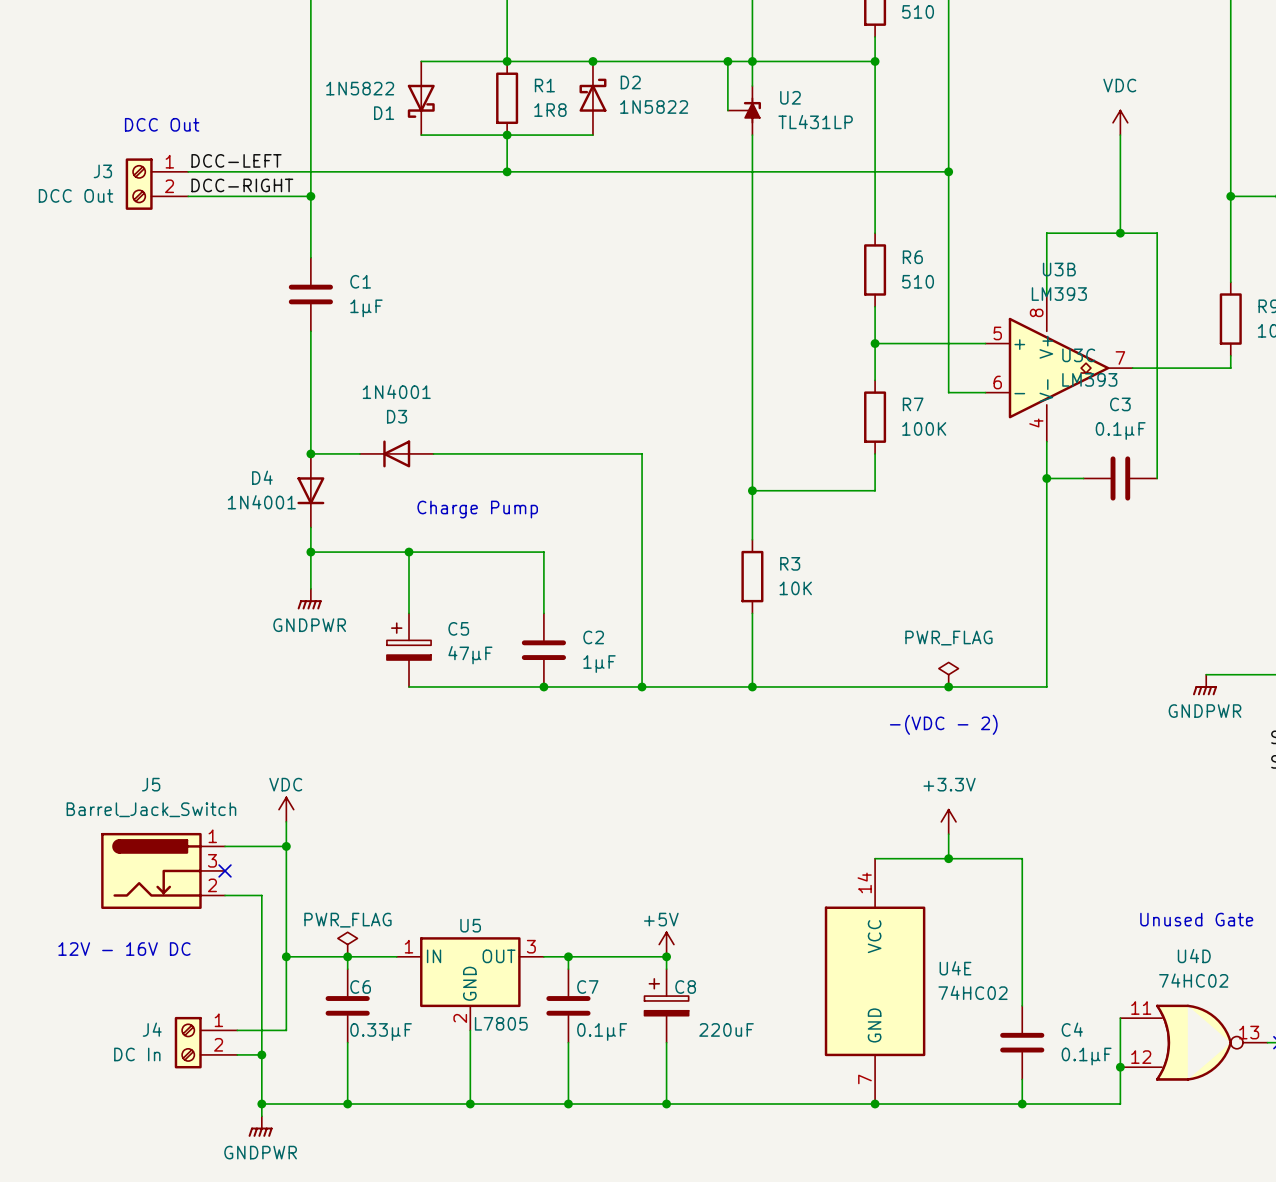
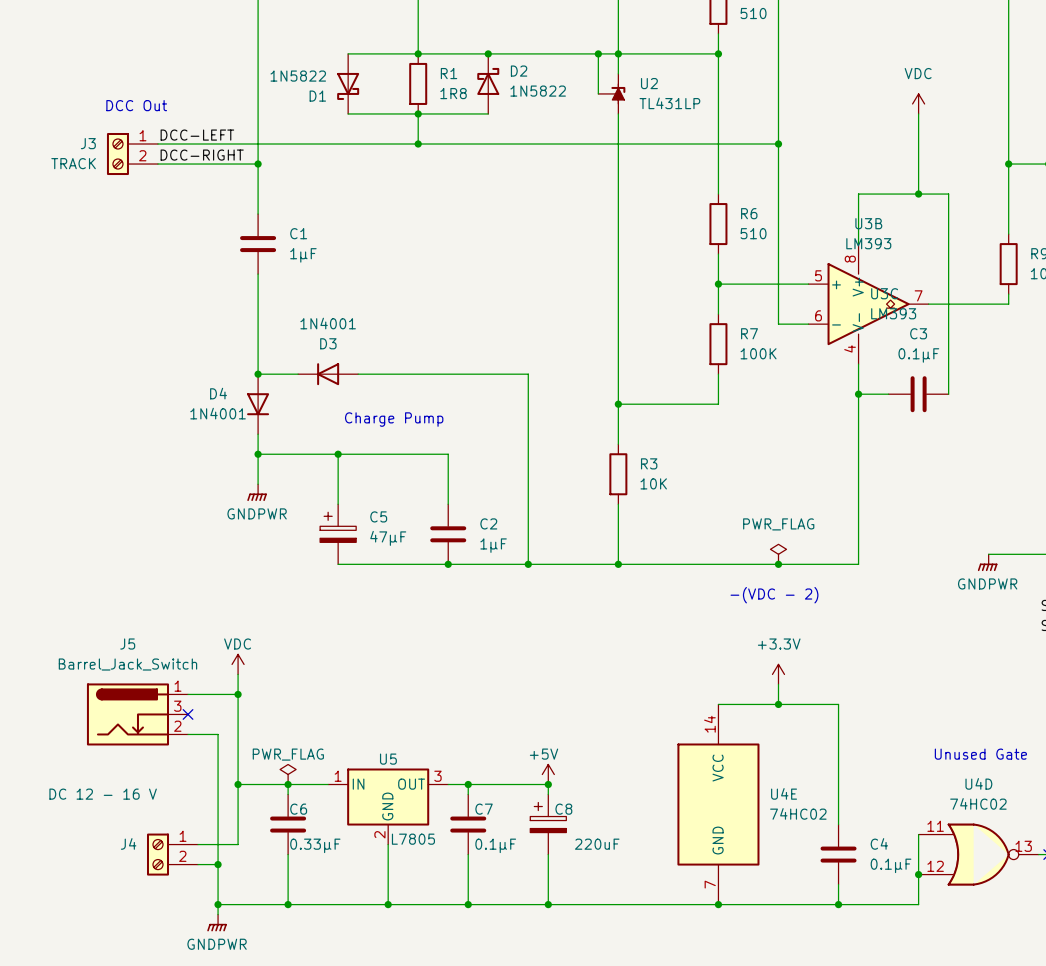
J3 value: DCC Out (76, 195) -> TRACK (73, 163)
text: 12V - 16V DC (124, 949) -> none
J4 value: DC In (137, 1054) -> DC 12 - 16 V (103, 794)

